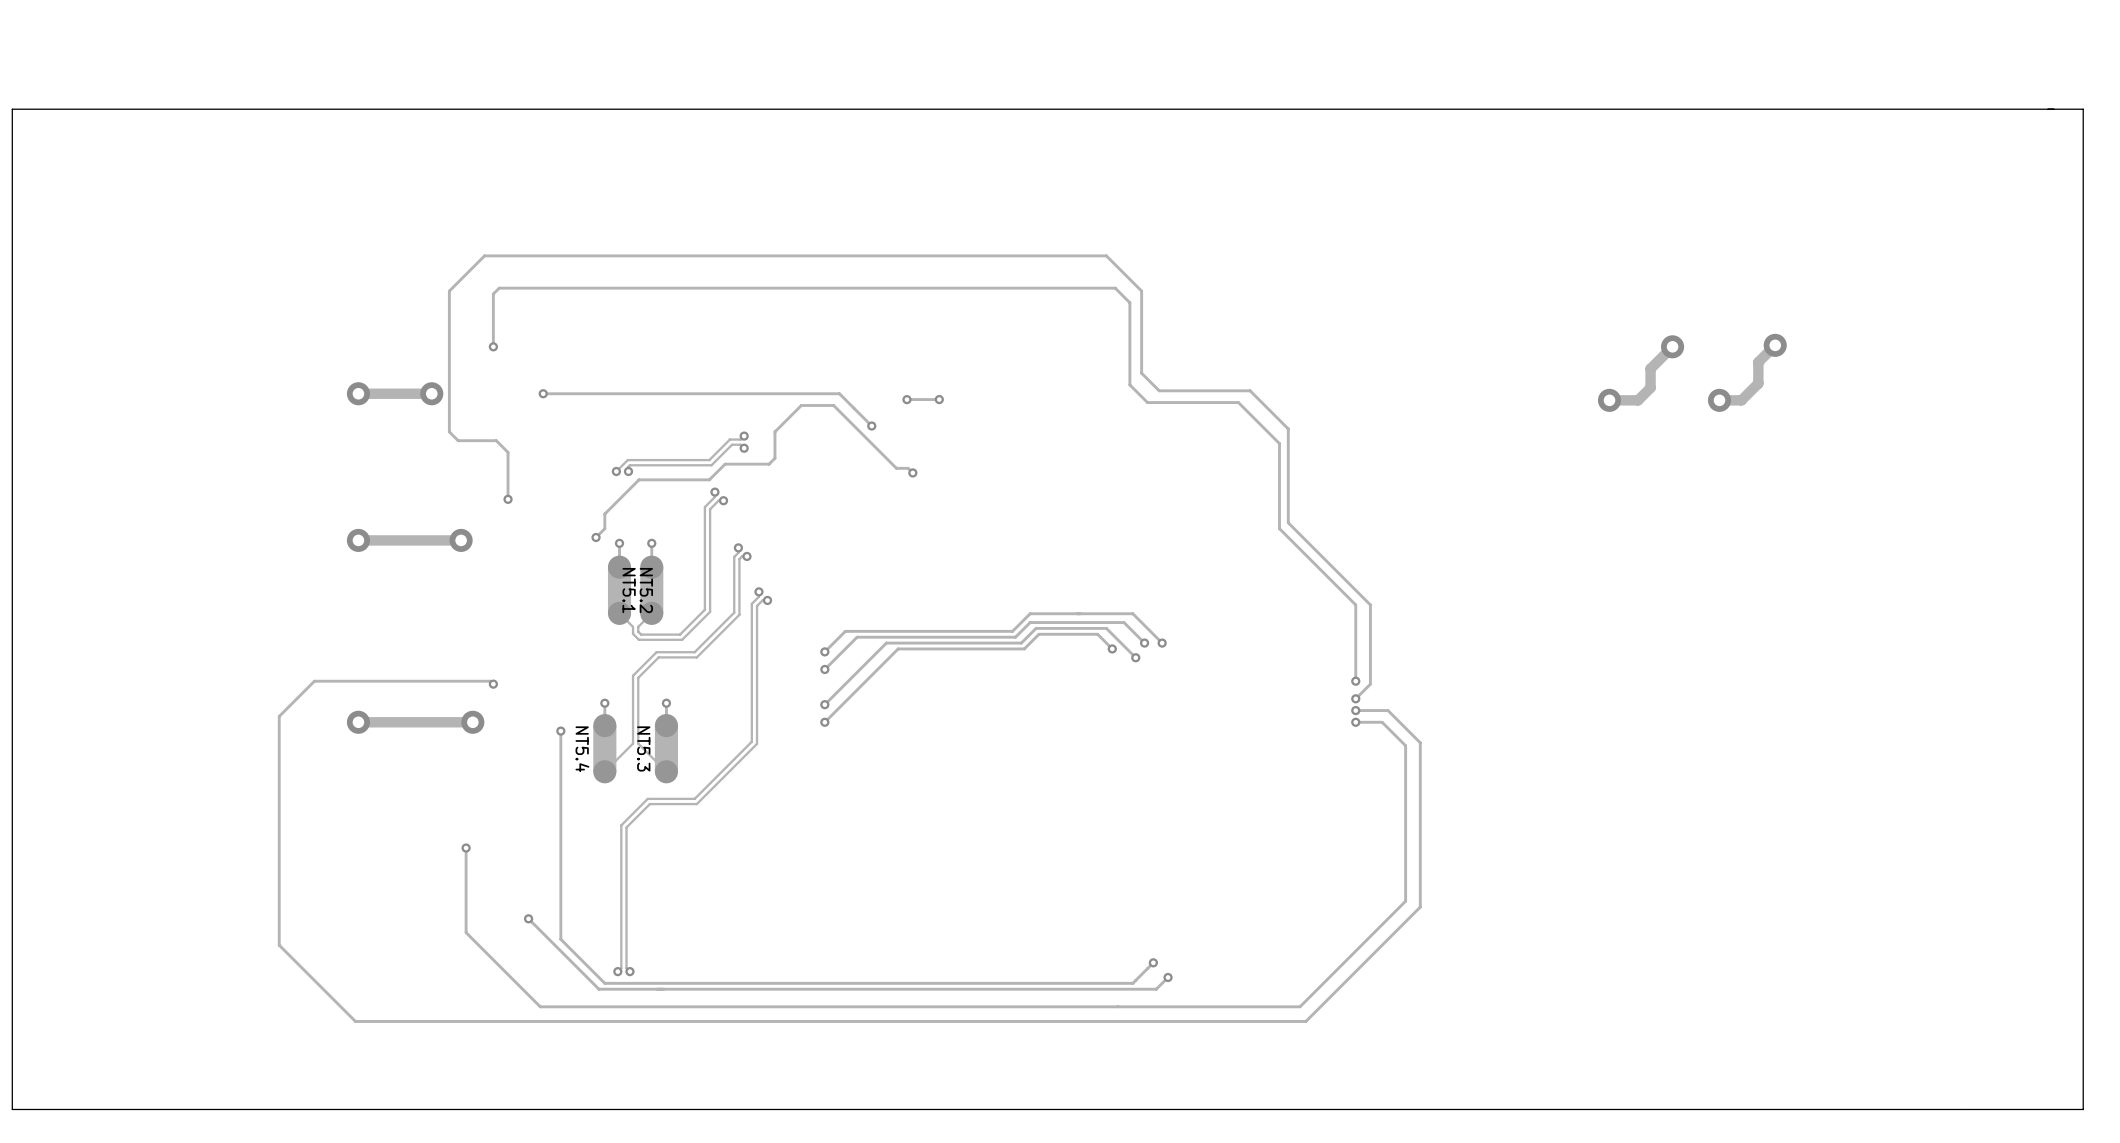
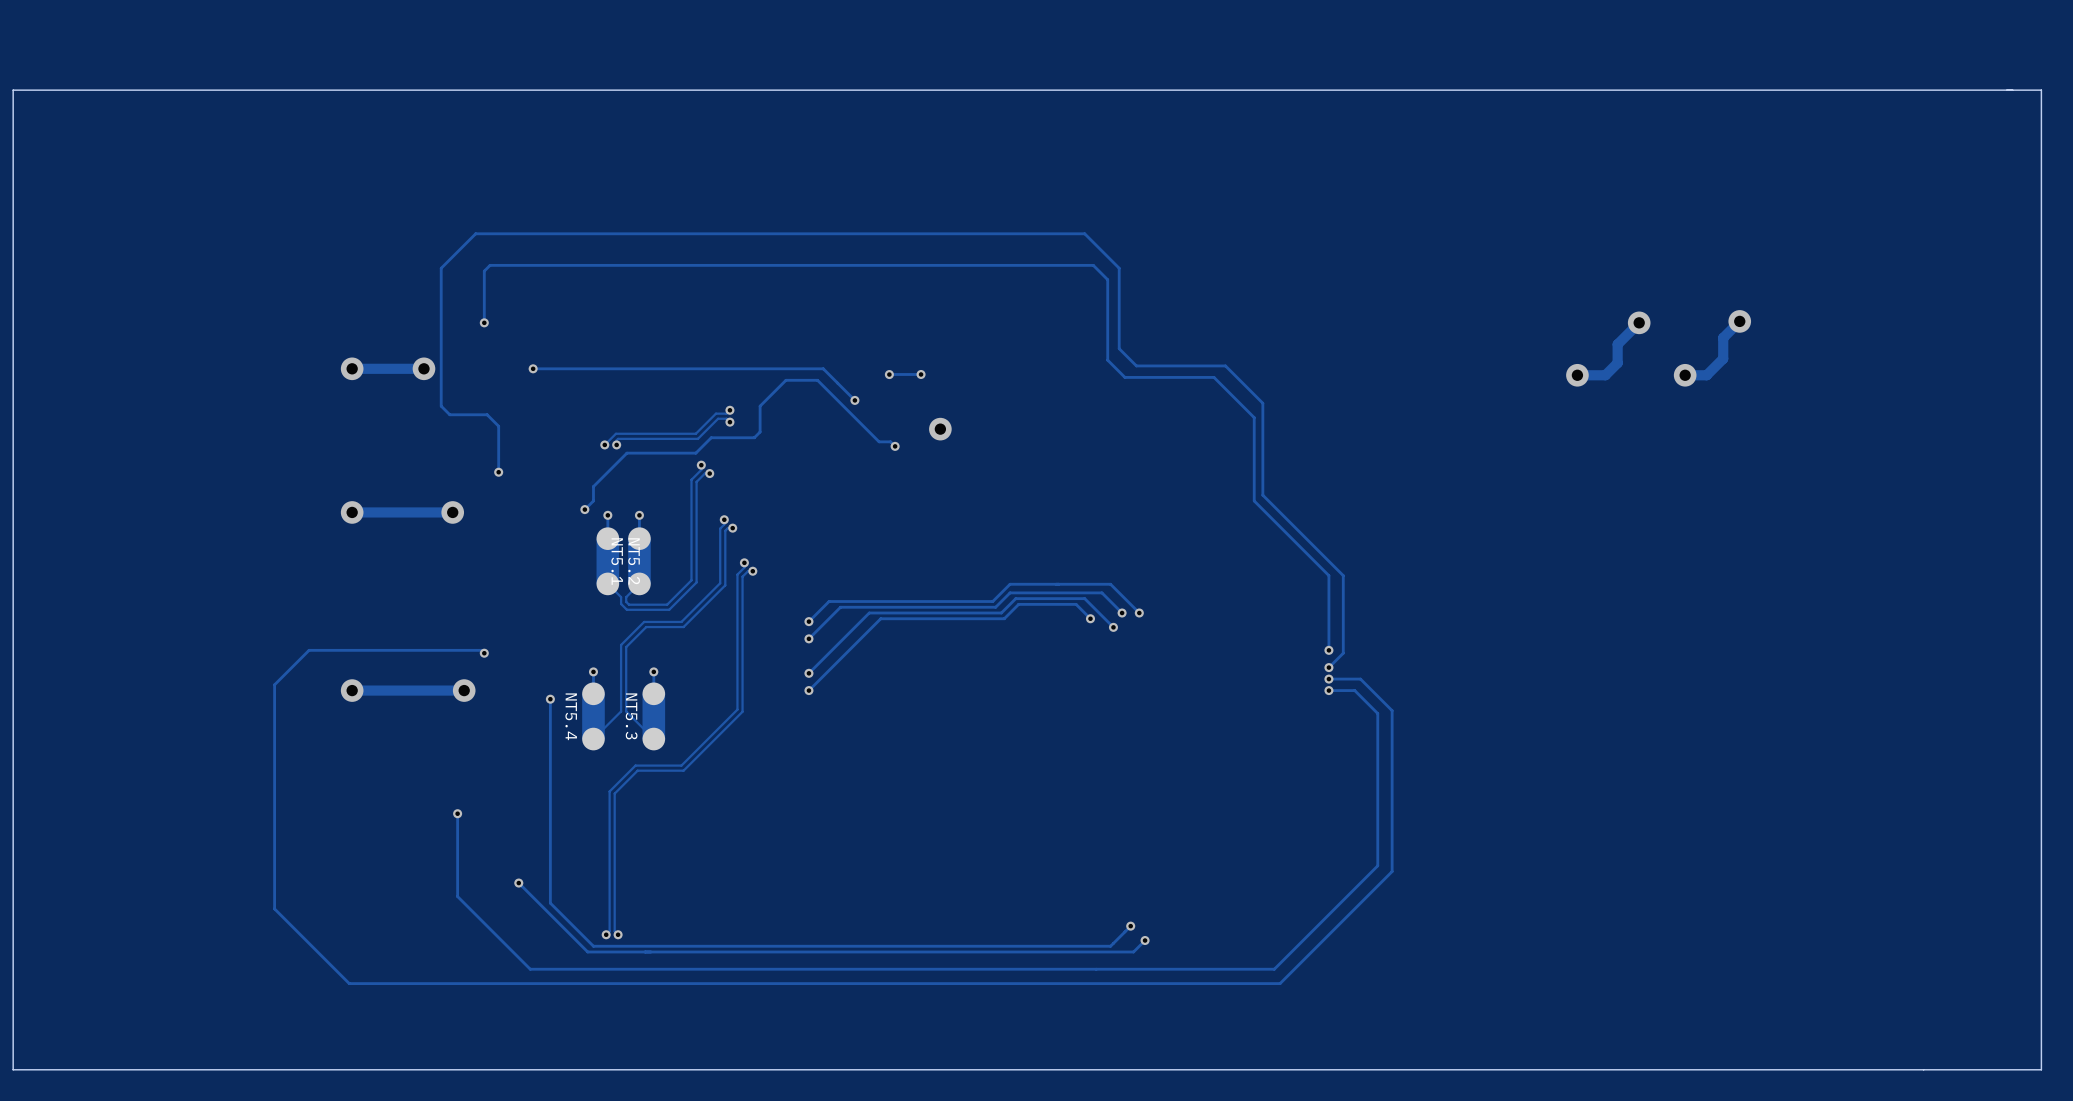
via: none -> (940, 429)

